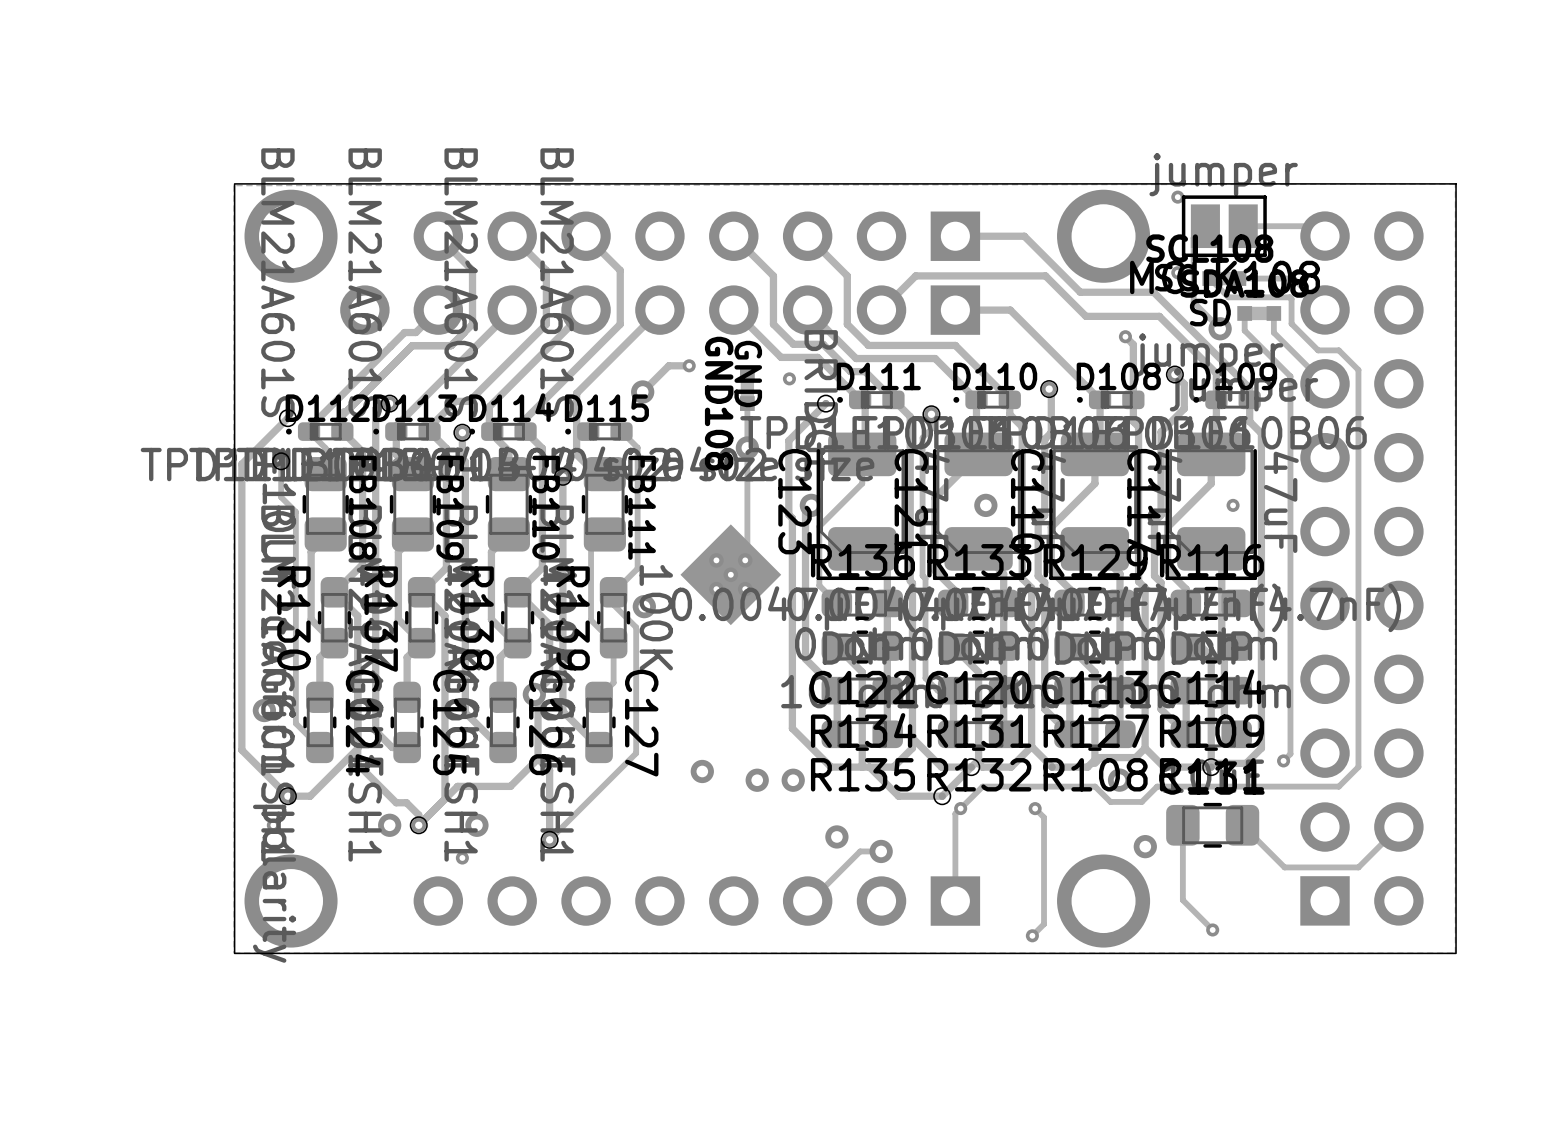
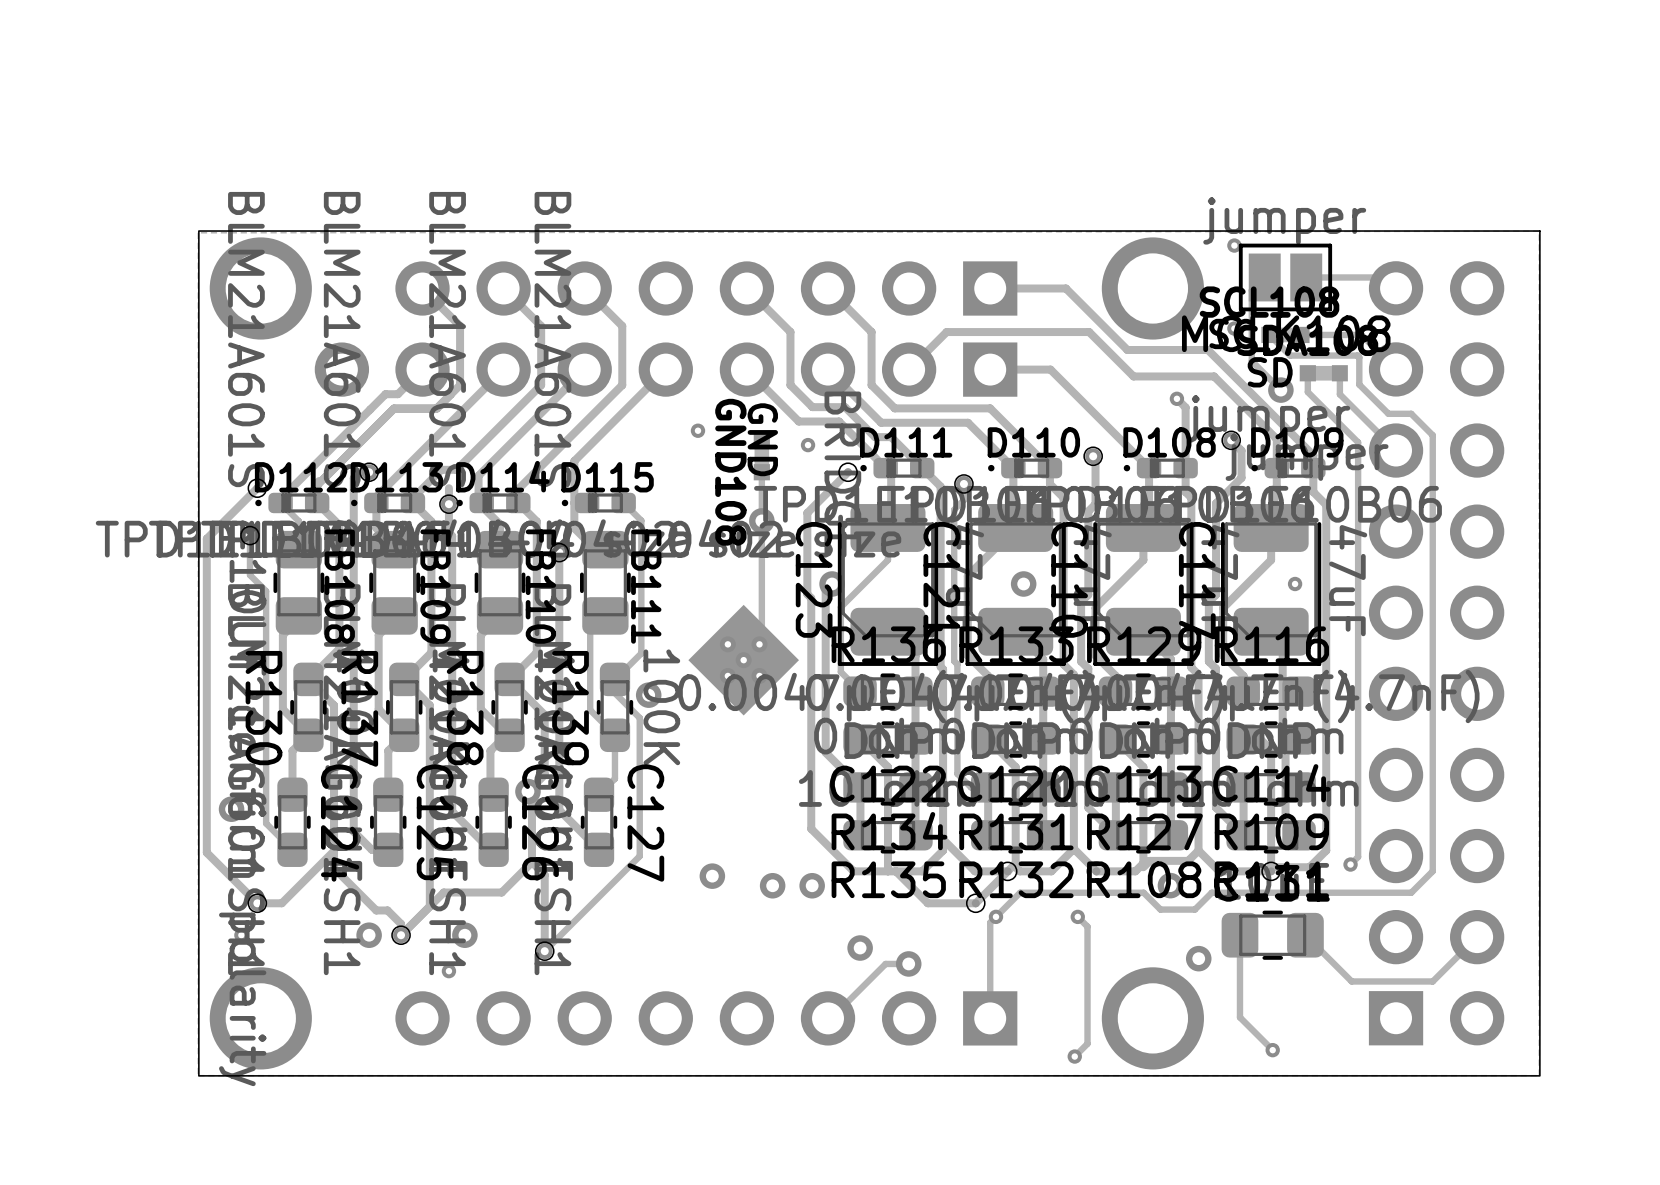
track: (689, 365) (668, 365) (642, 391) -> none
via: (642, 391) -> none
track: none -> (448, 488) (448, 504)

